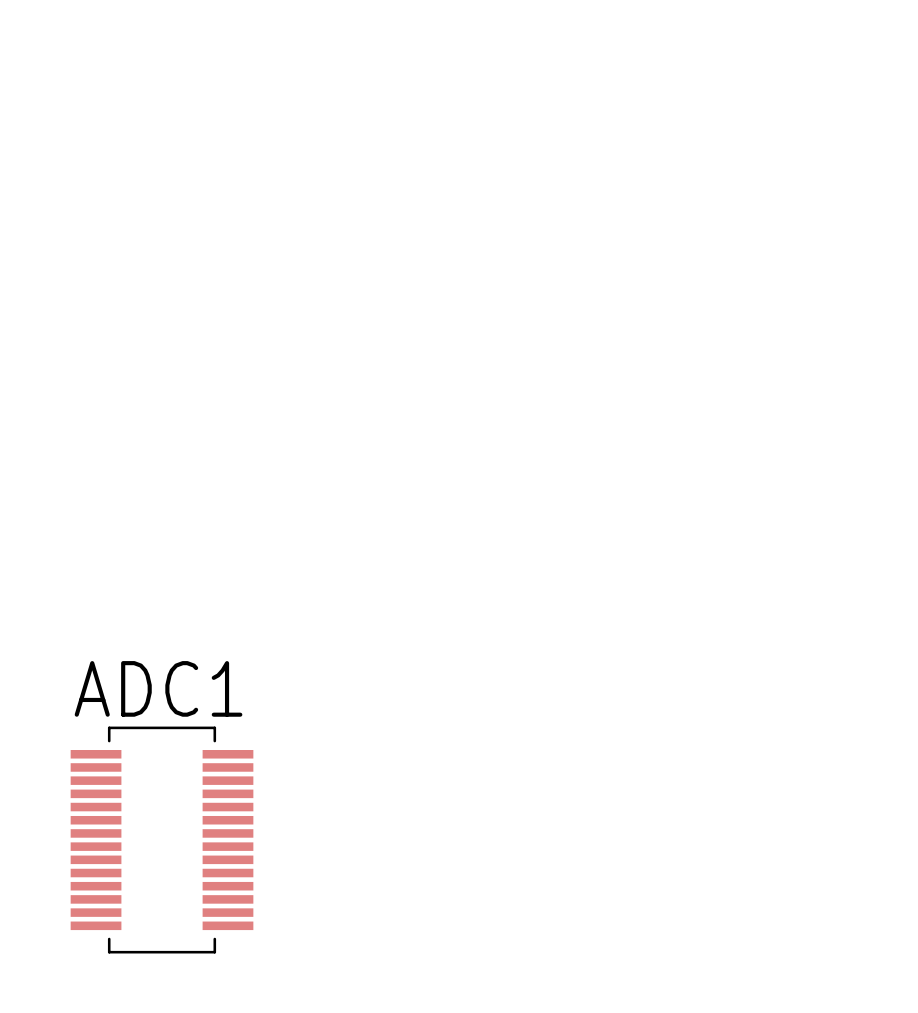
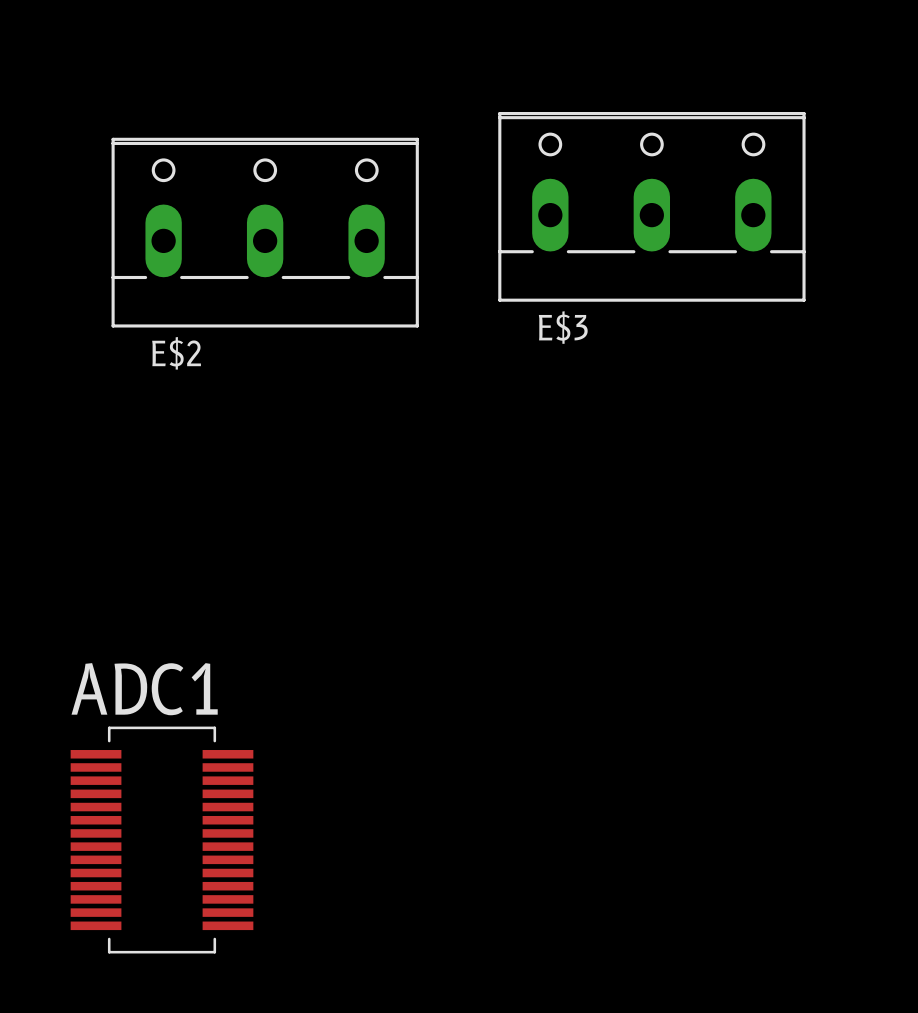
E$3: none -> (651, 206)
E$2: none -> (265, 232)

